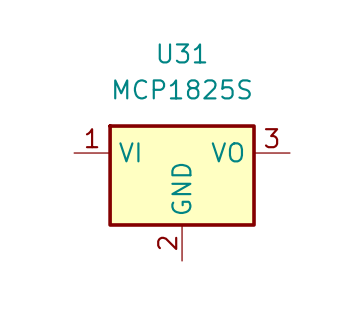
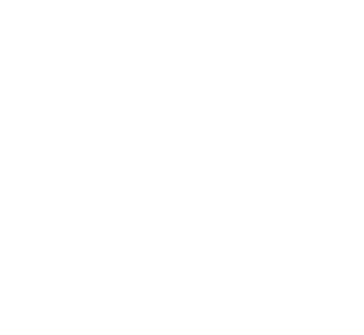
U31: MCP1825S (182, 192) -> none

